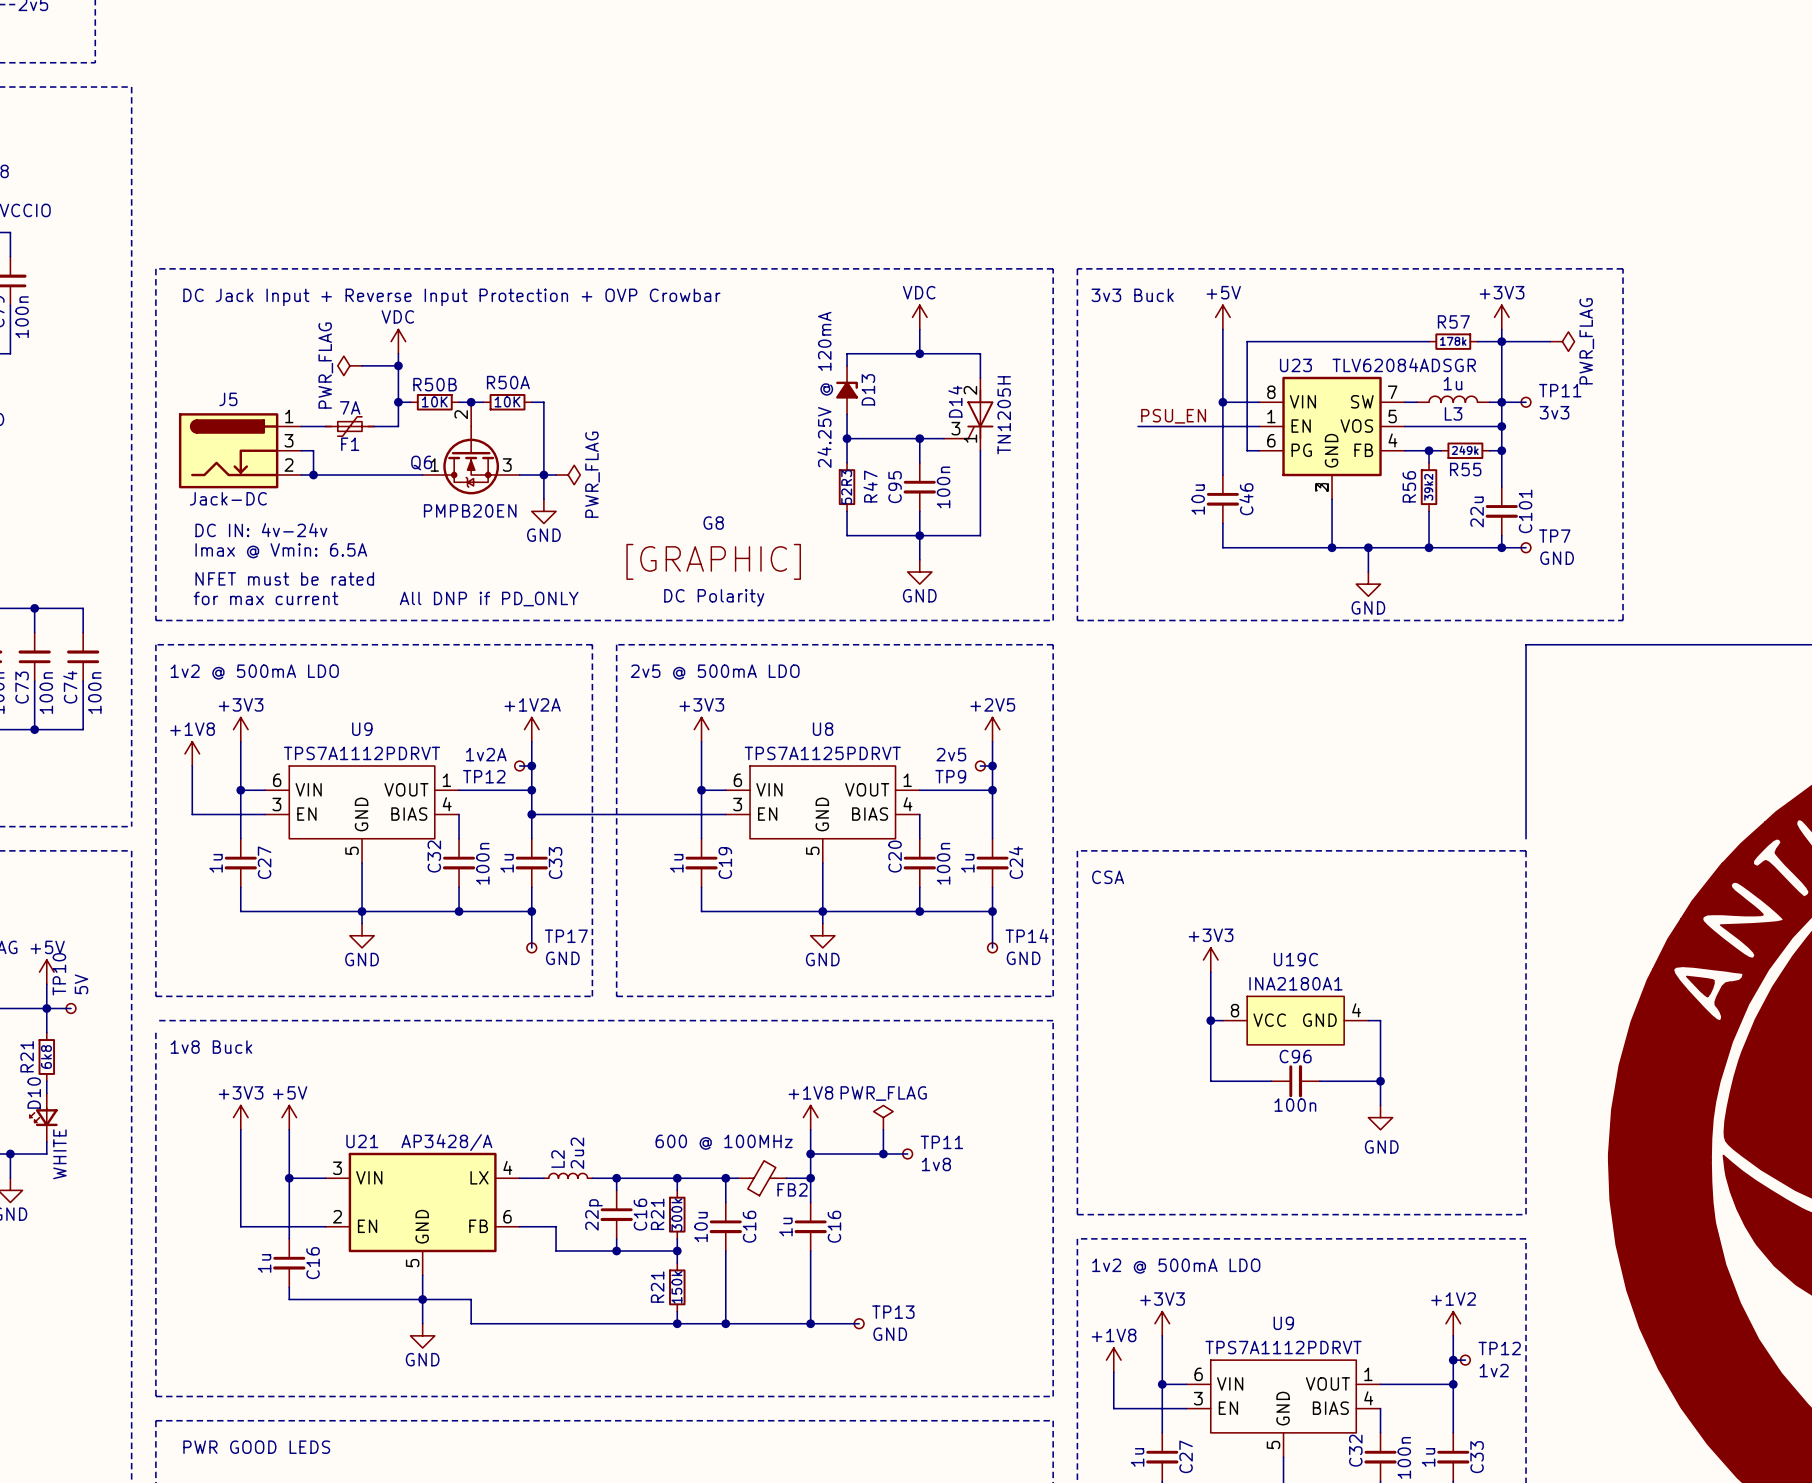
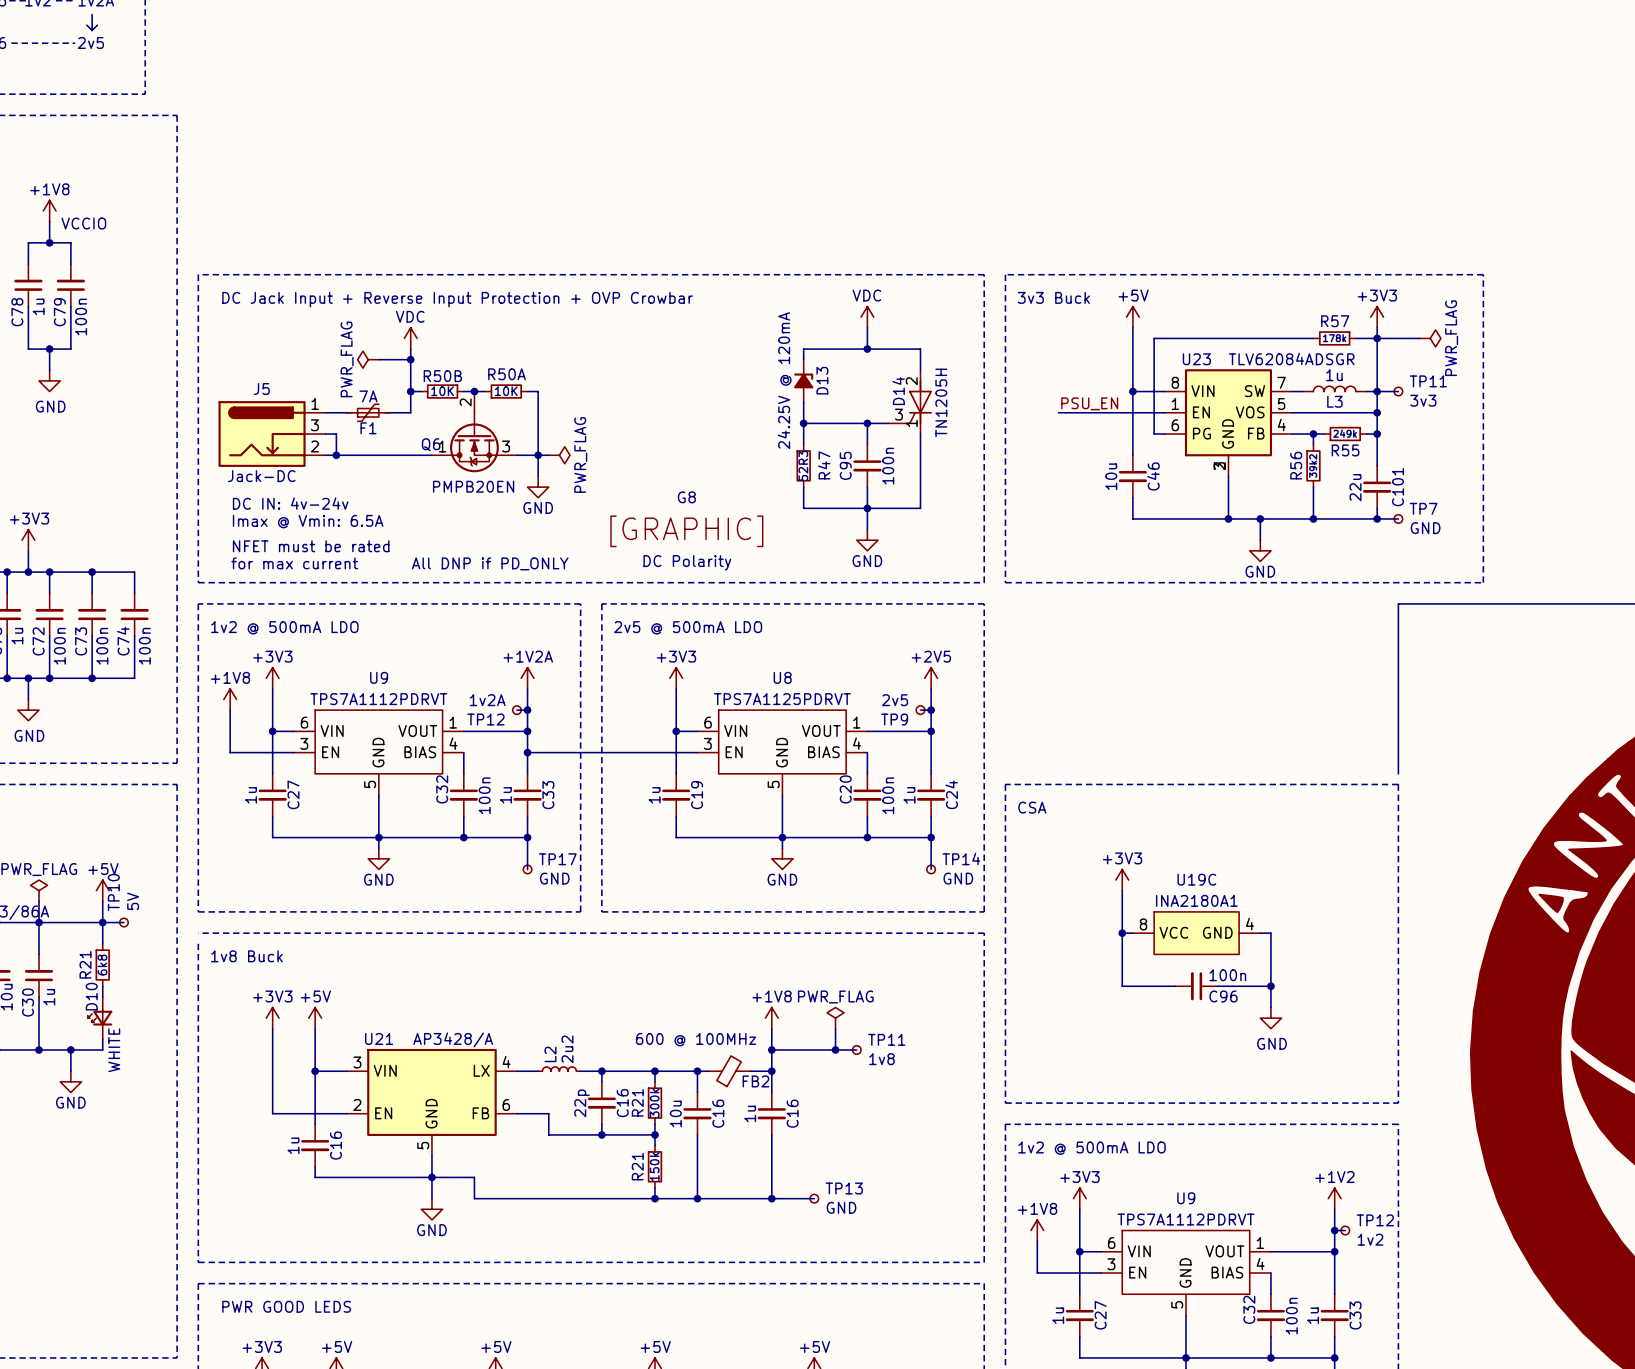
C96 name position: C96 (1295, 1056) -> C96 (1223, 996)
C96 rotation: 0° (1295, 1081) -> 180° (1196, 986)
C96 value position: 100n (1295, 1105) -> 100n (1227, 975)

